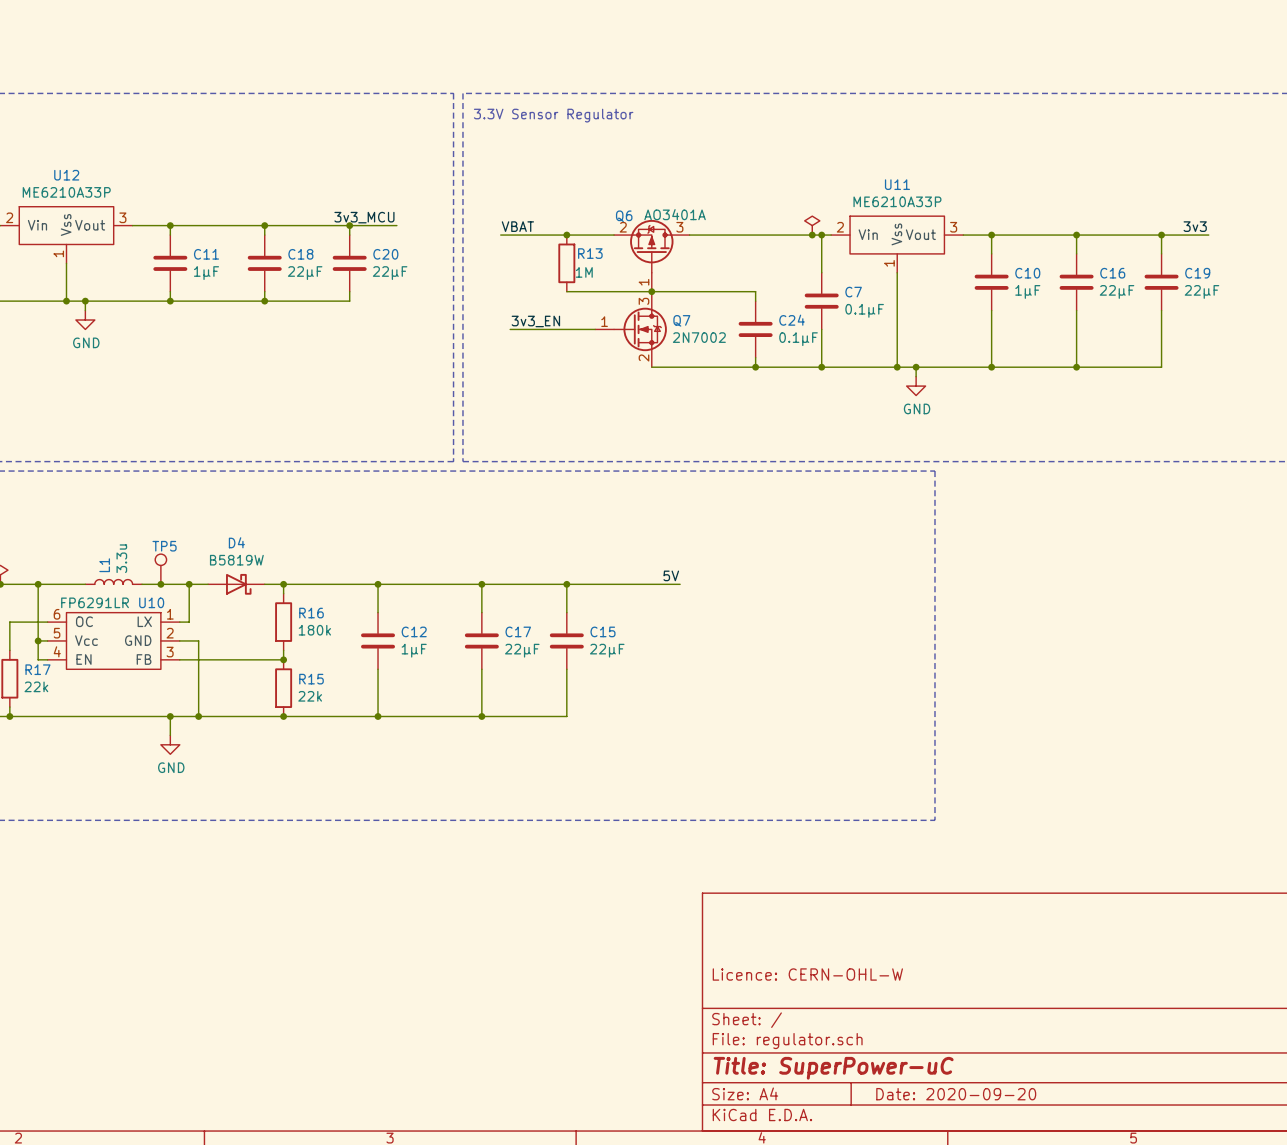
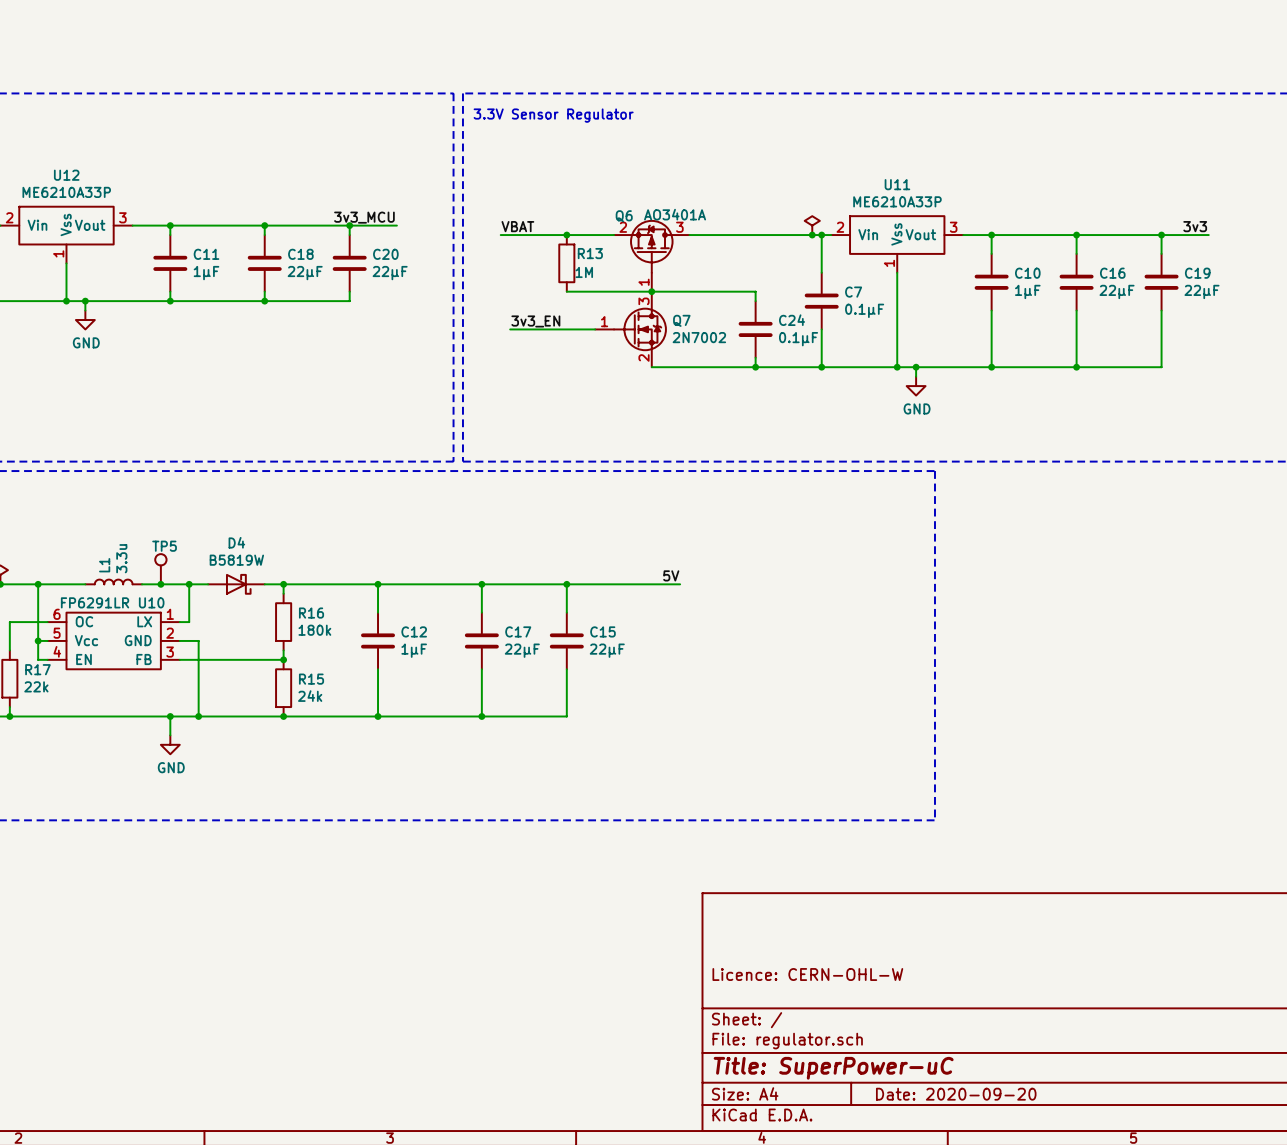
R15 value: 22k (310, 696) -> 24k (310, 696)

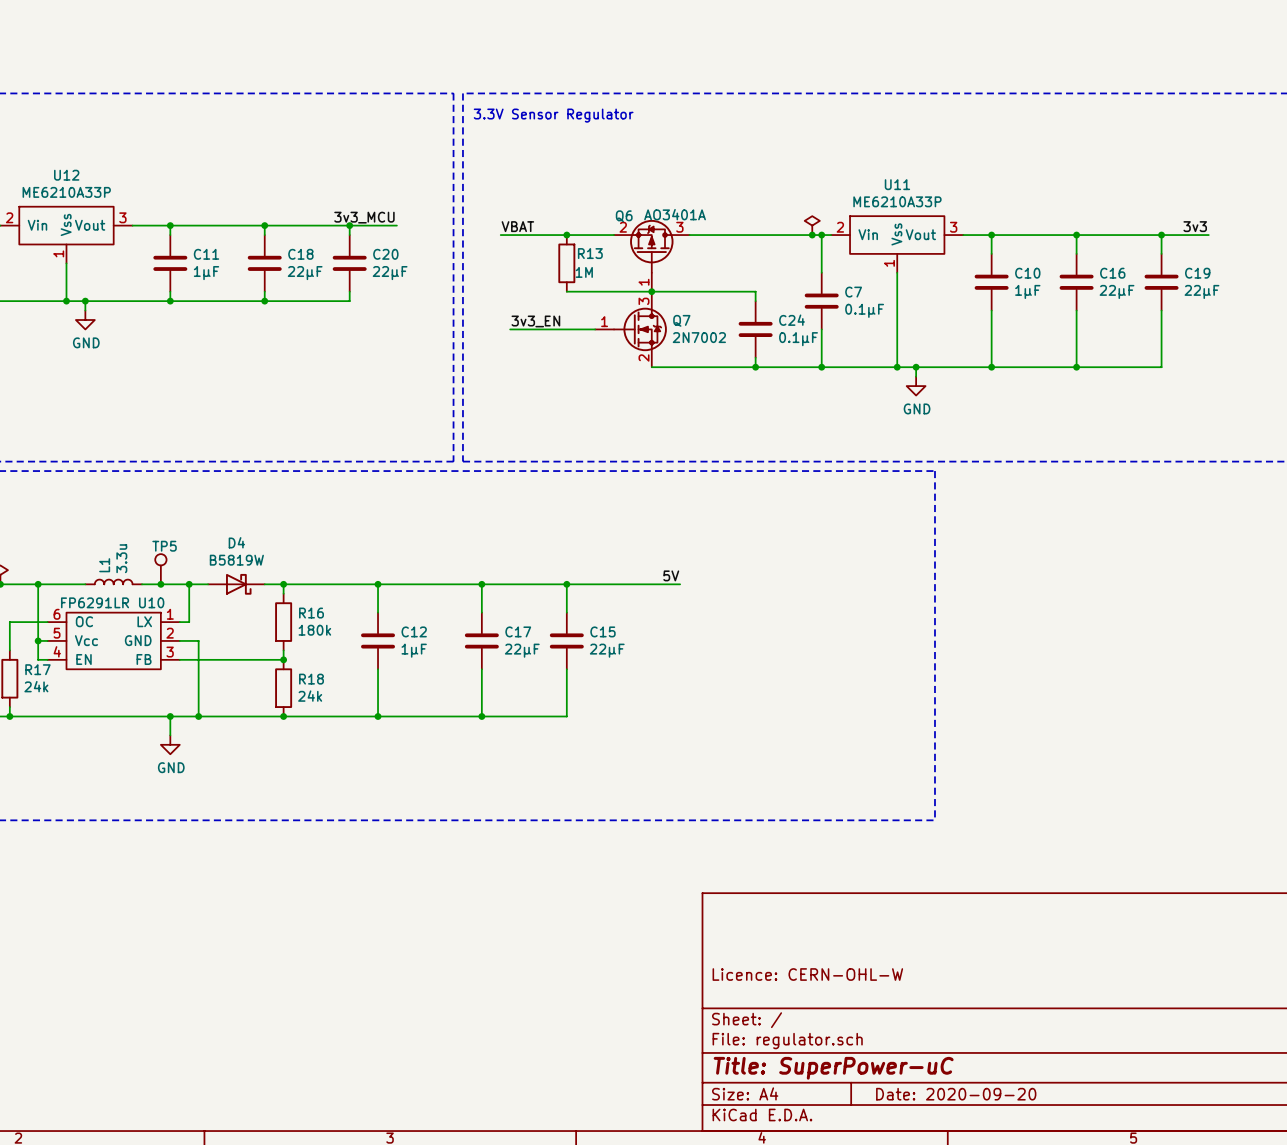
R15 name: R15 (311, 679) -> R18 (311, 679)
R17 value: 22k (36, 686) -> 24k (36, 686)

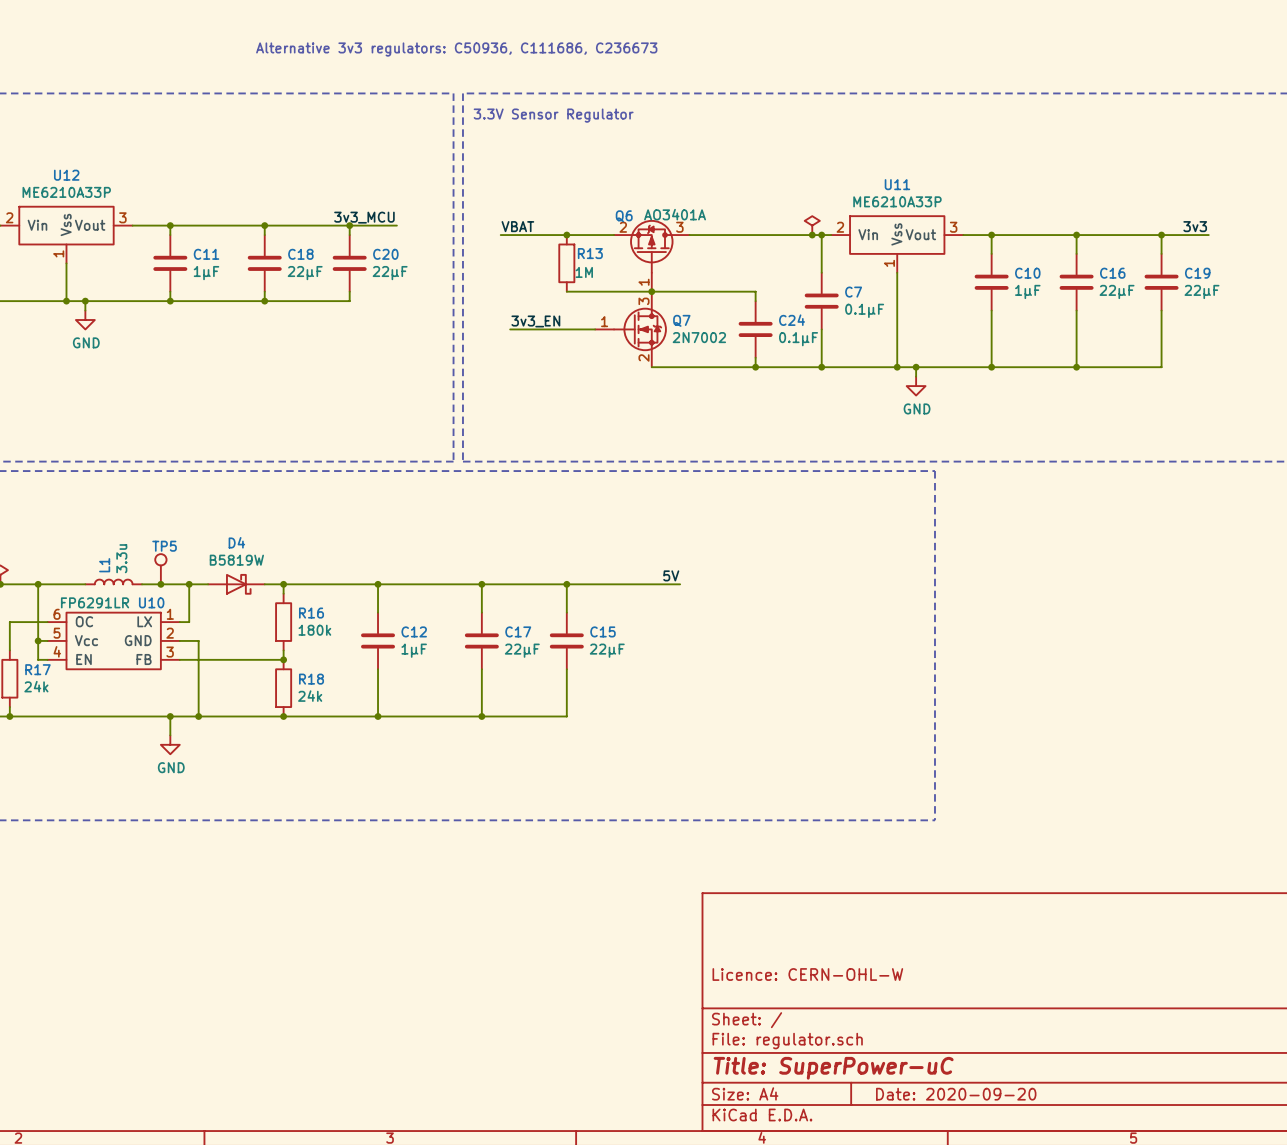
text: none -> Alternative 3v3 regulators: C50936, C111686, C236673 (456, 49)

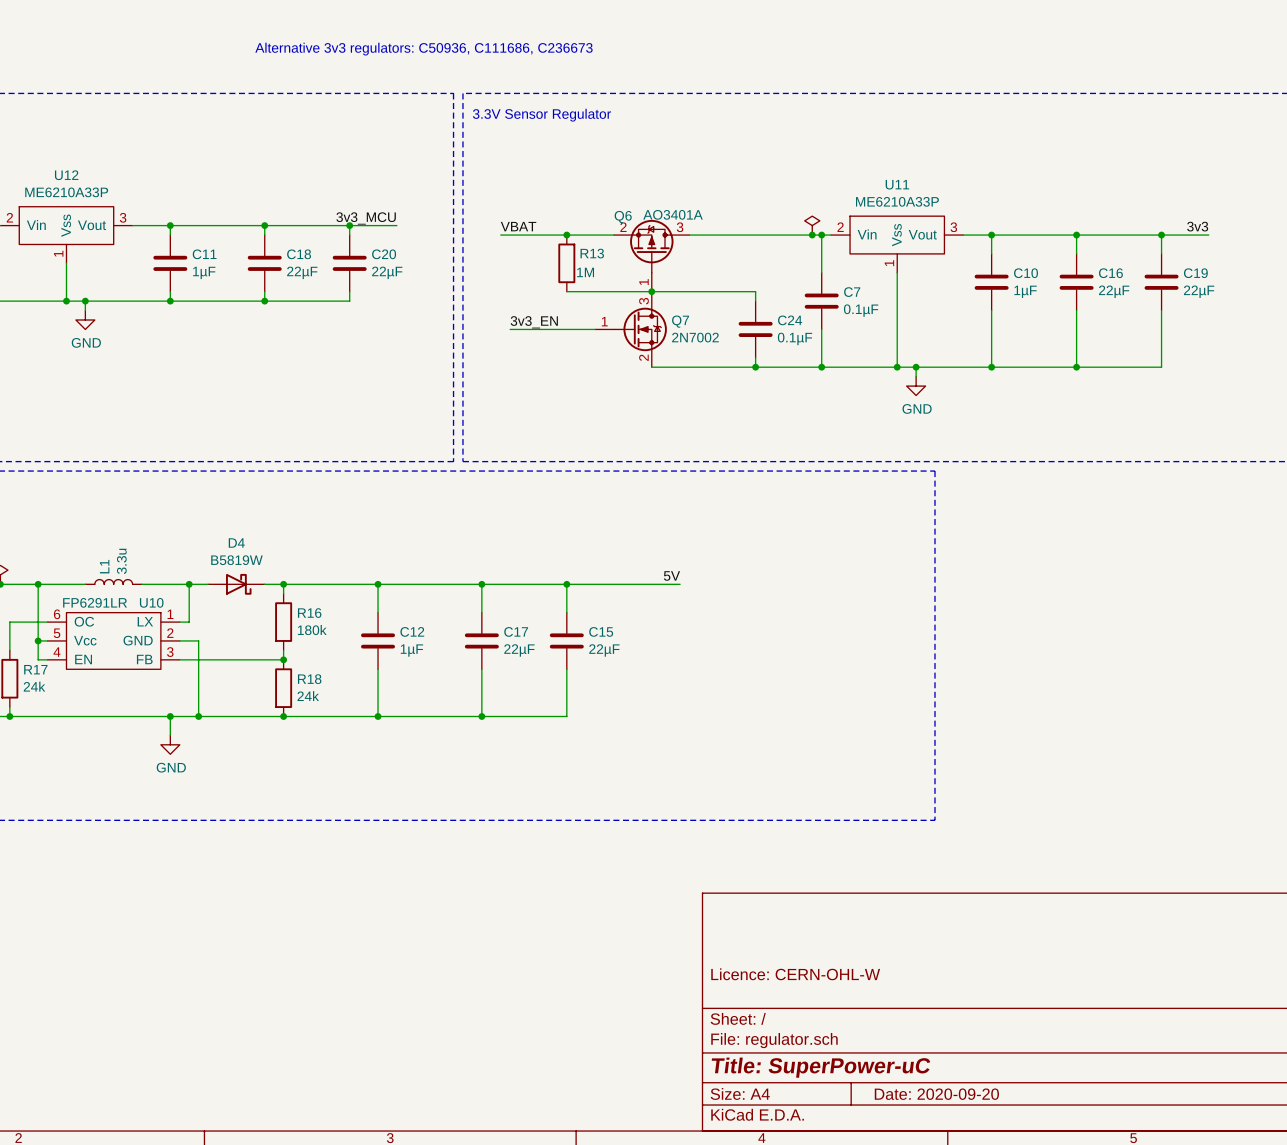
TP5: (160, 569) -> none
junction: (160, 584) -> none

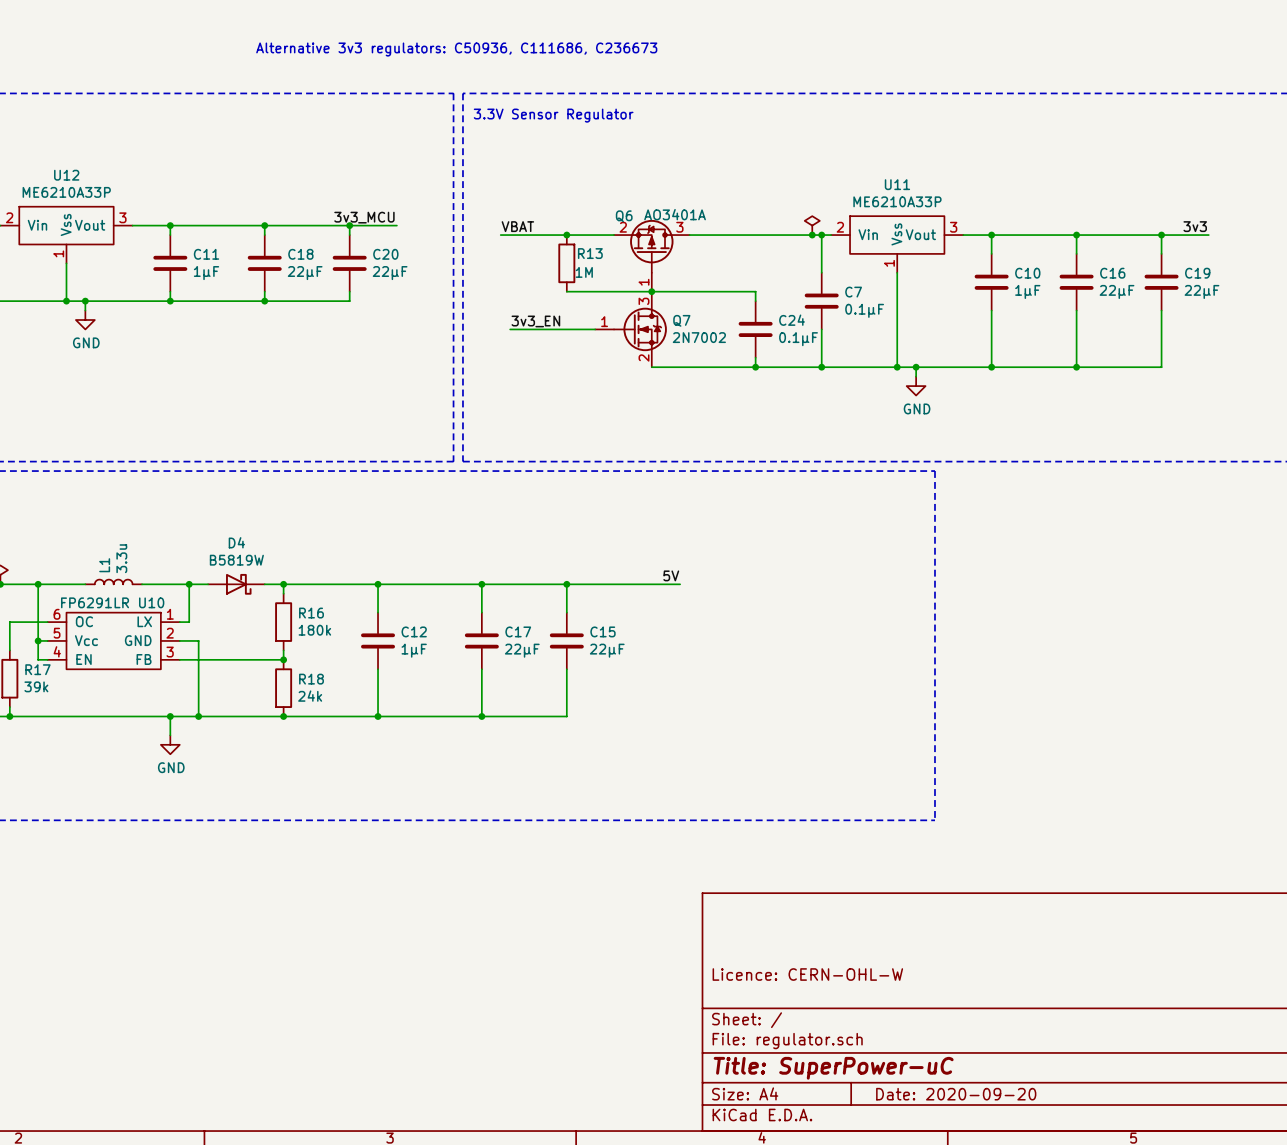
R17 value: 24k (34, 686) -> 39k (36, 686)

